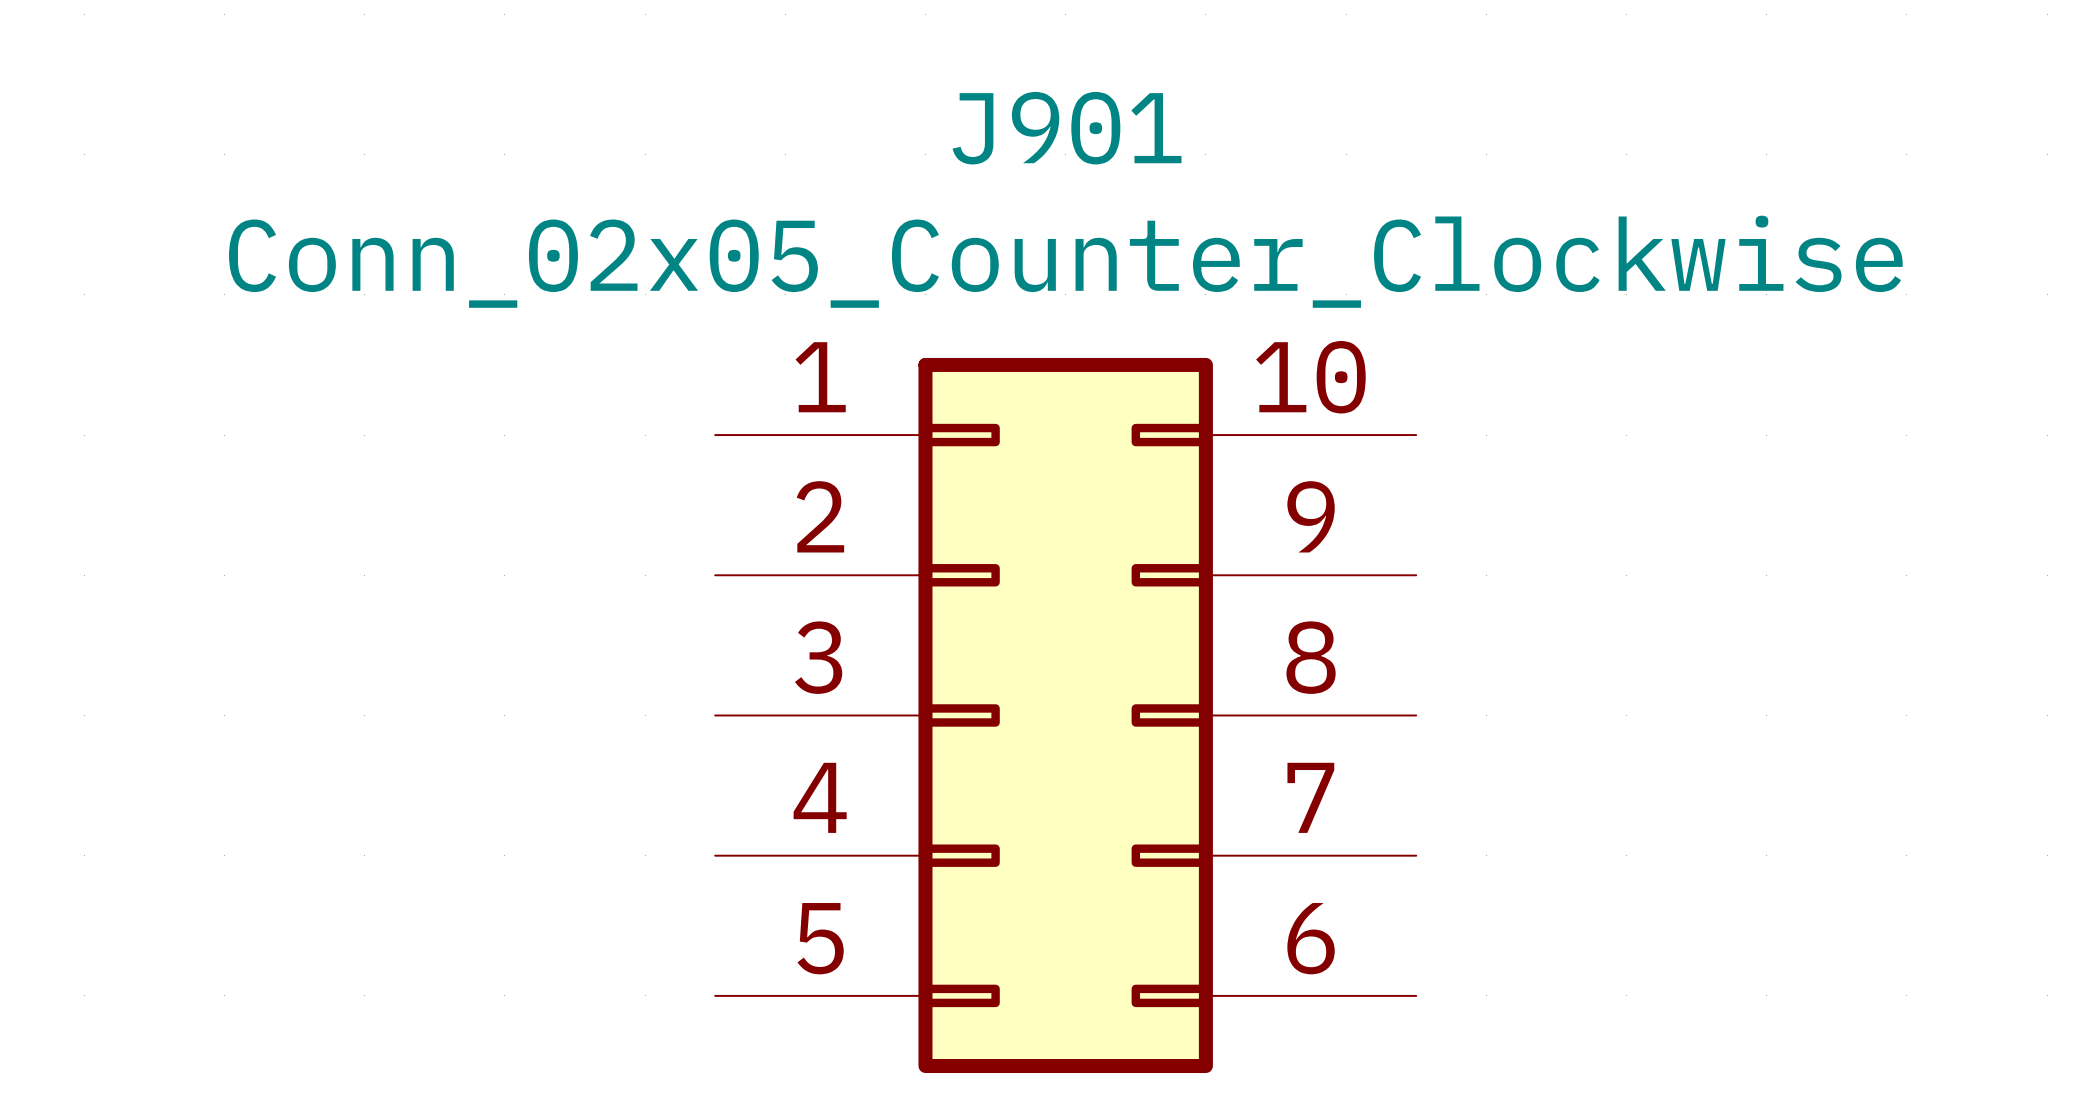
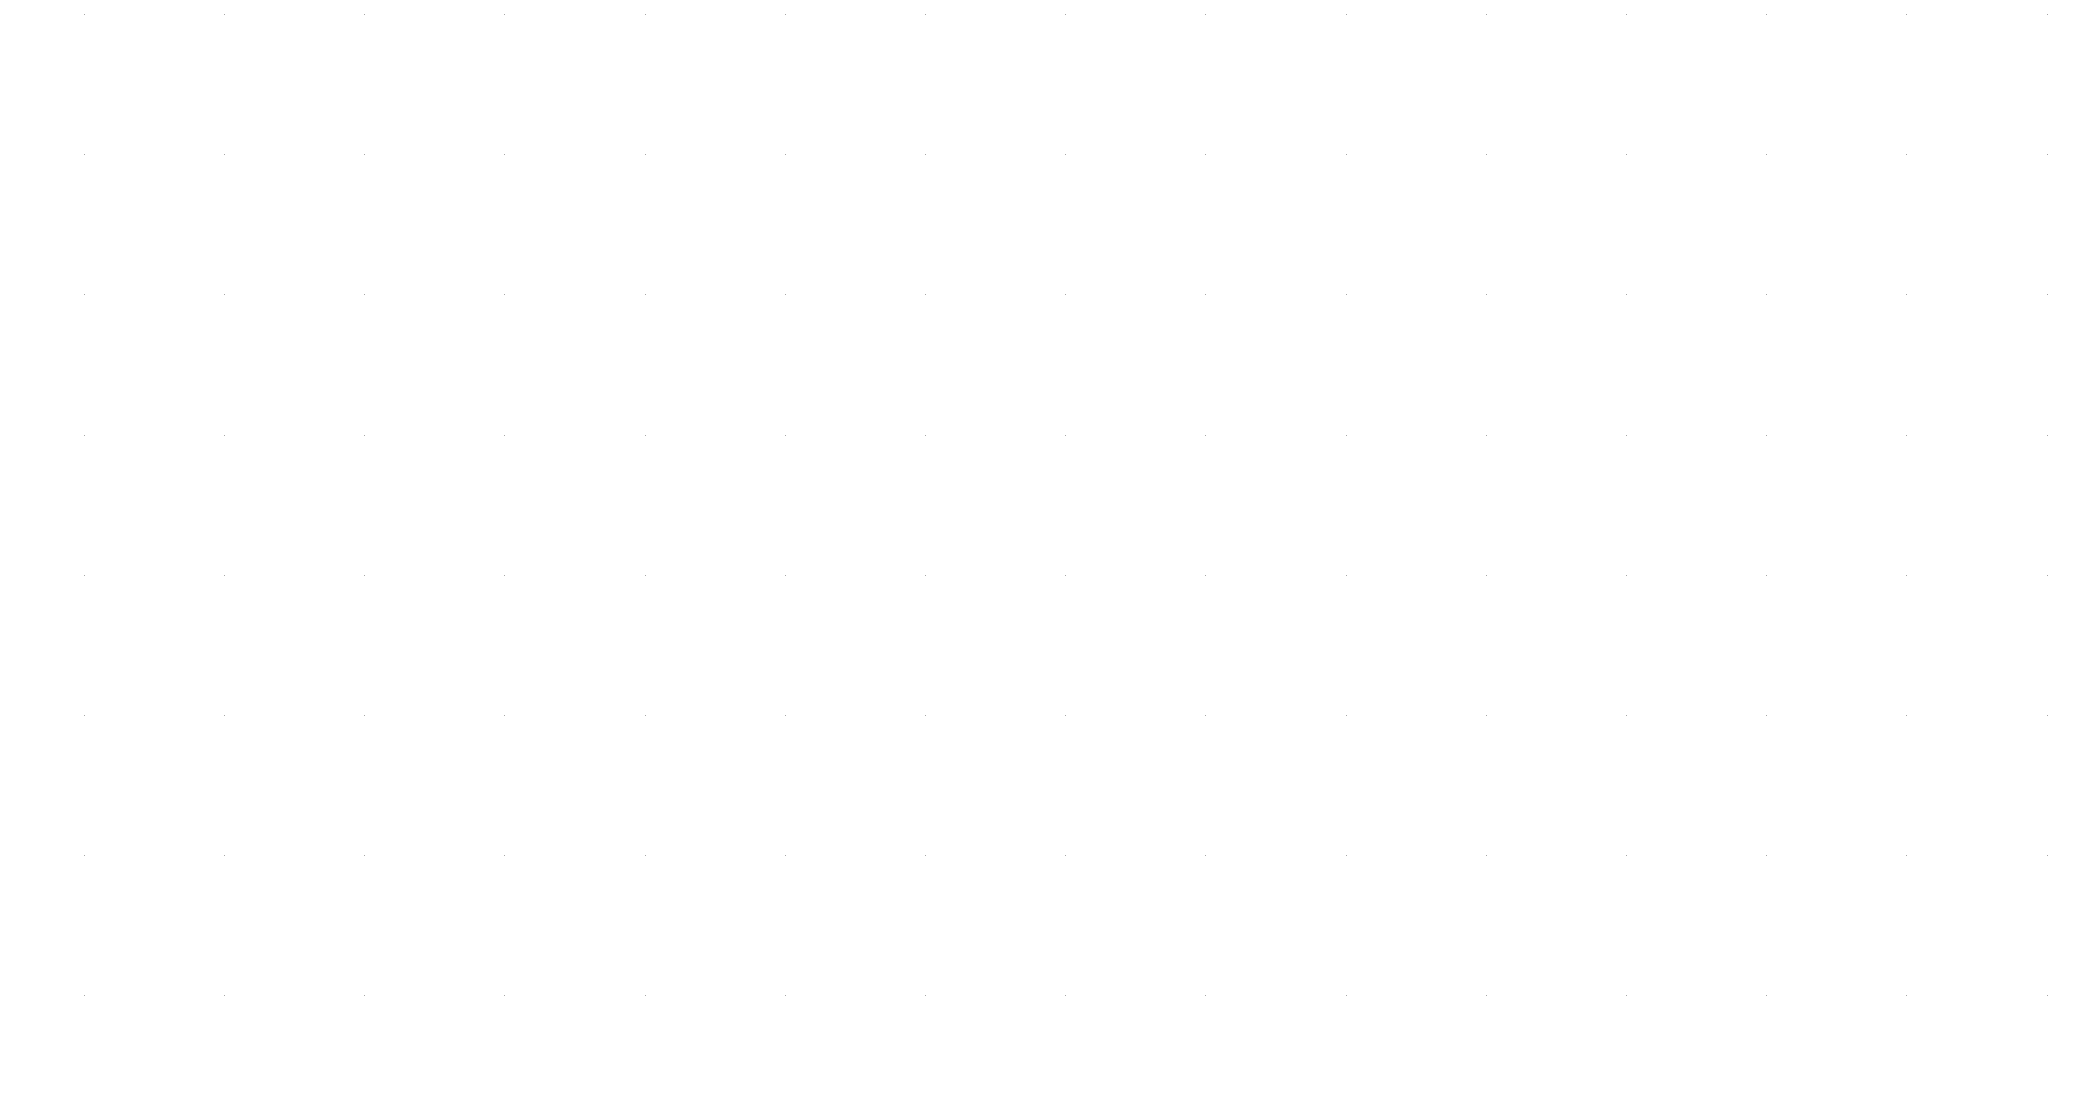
J901: Conn_02x05_Counter_Clockwise (1065, 715) -> none

